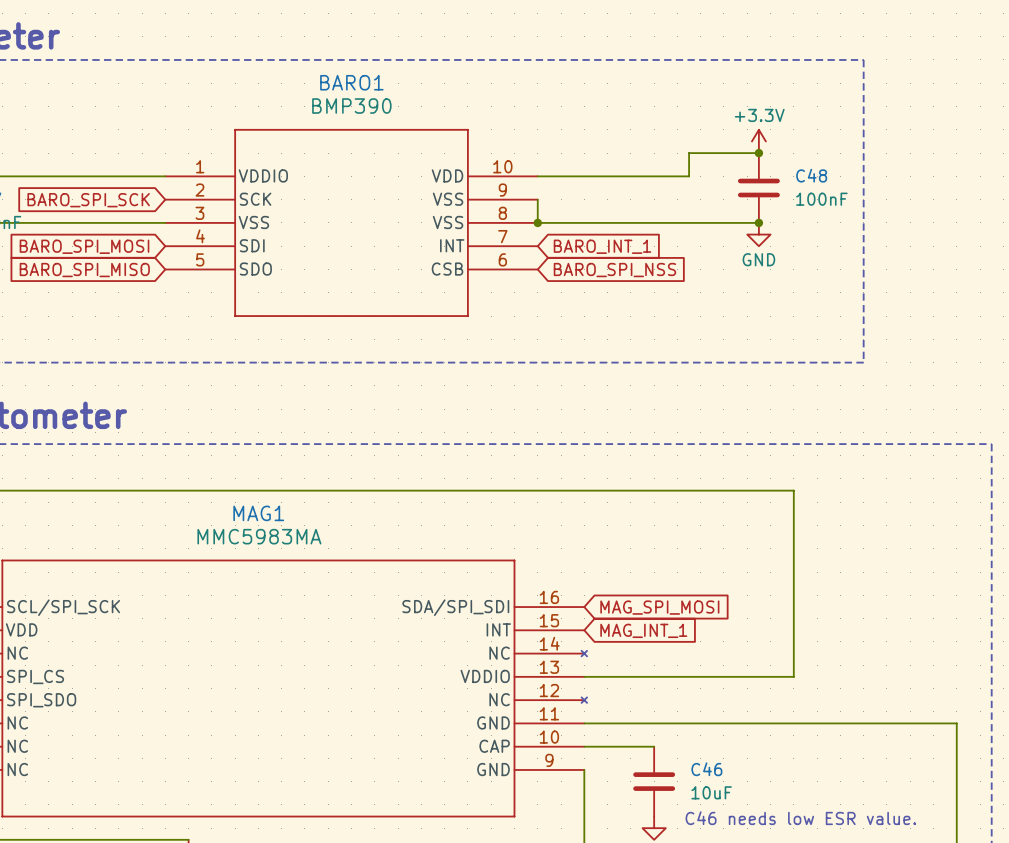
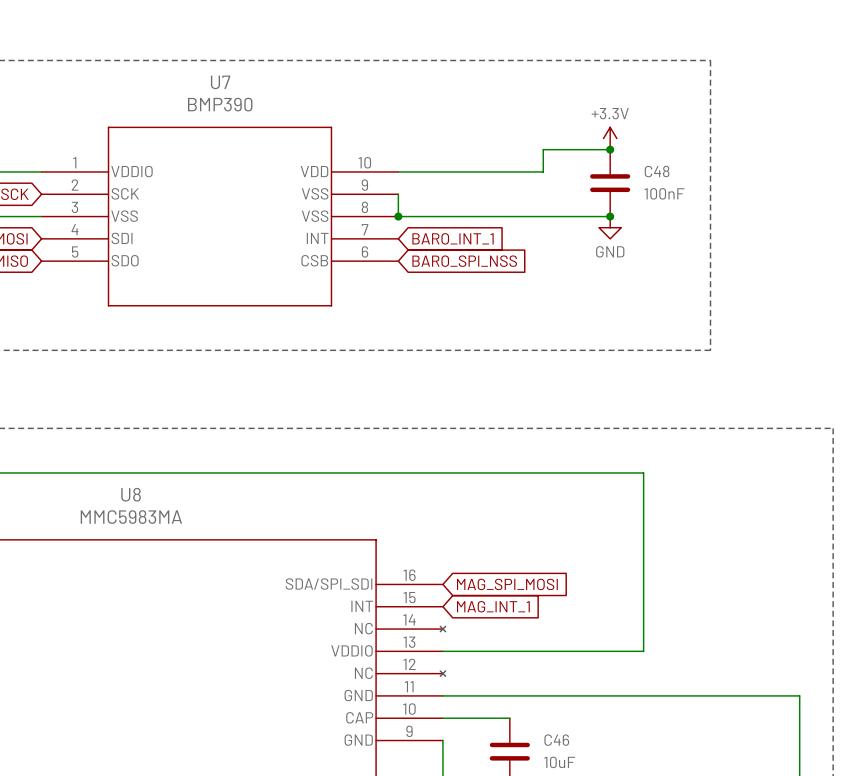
BARO1 name: BARO1 (351, 82) -> U7 (220, 82)
MAG1 name: MAG1 (258, 513) -> U8 (131, 494)

